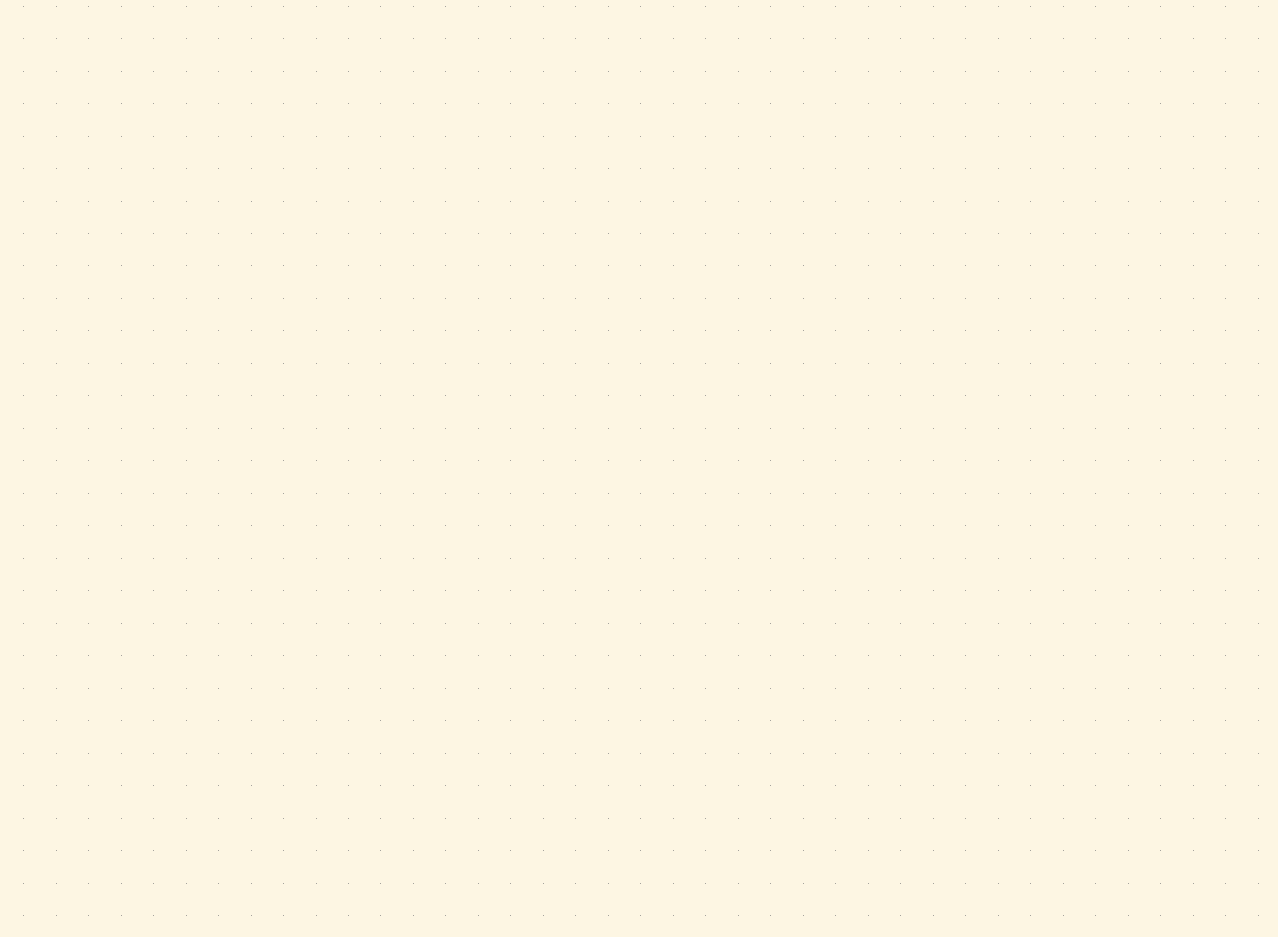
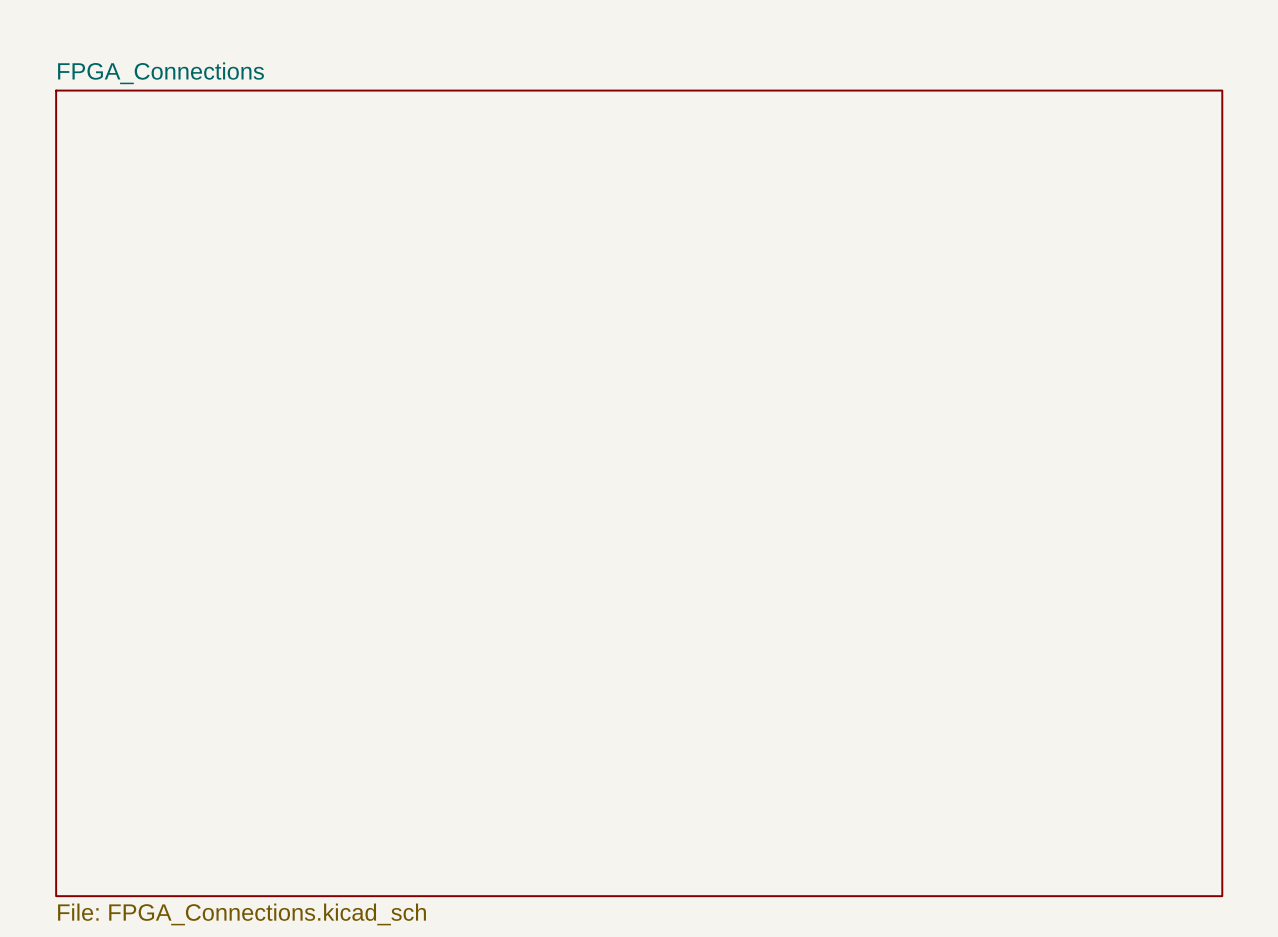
sheet FPGA_Connections: none -> File: FPGA_Connections.kicad_sch (639, 493)

